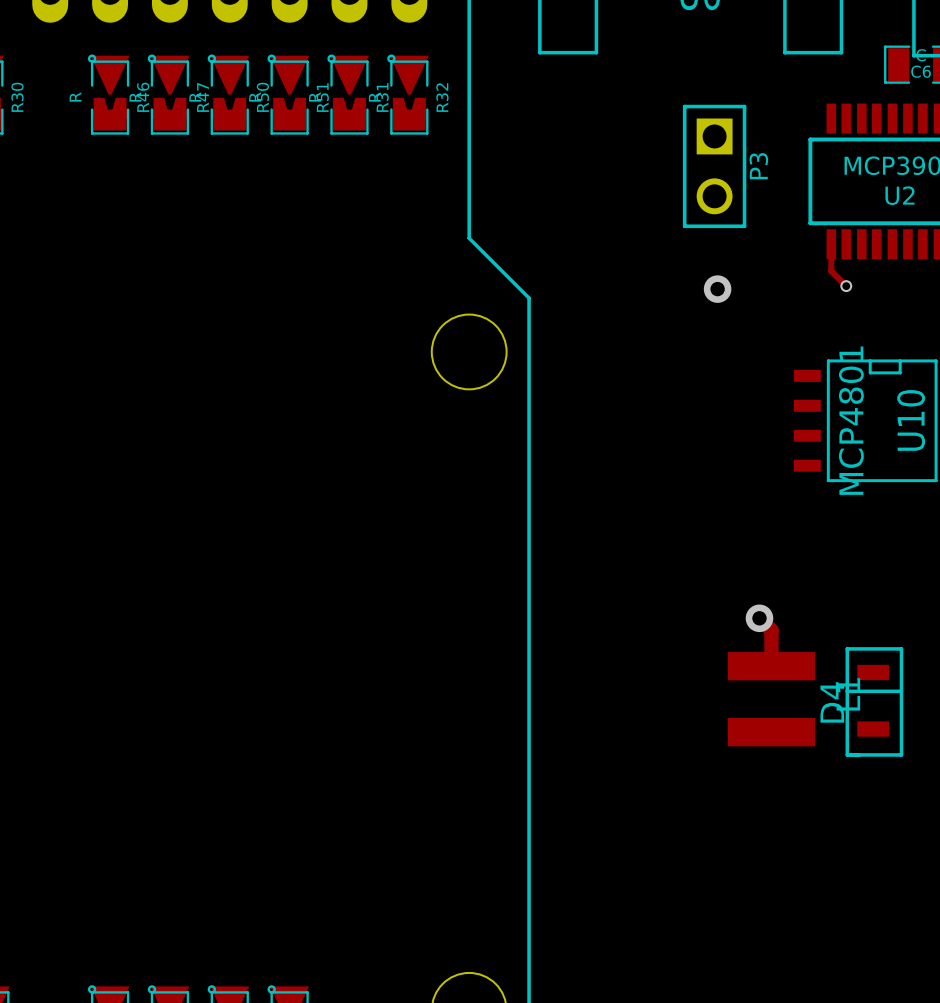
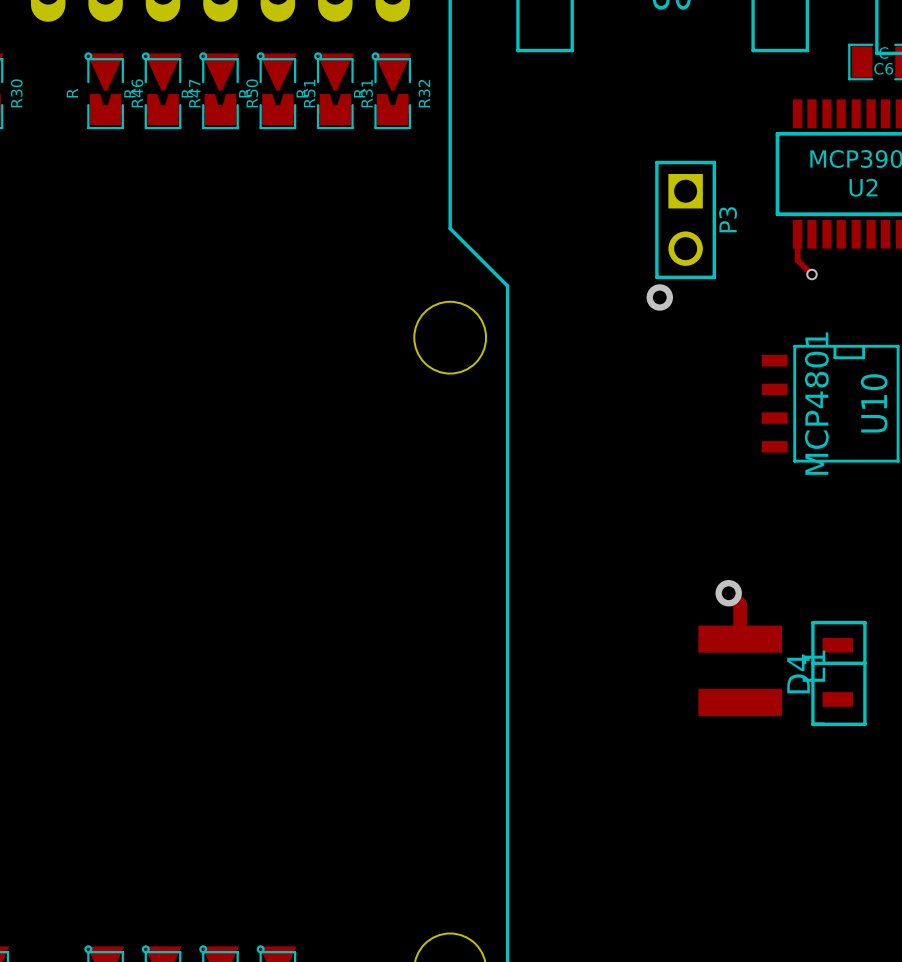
P3 position: (714, 166) -> (685, 219)
via position: (717, 289) -> (659, 297)

